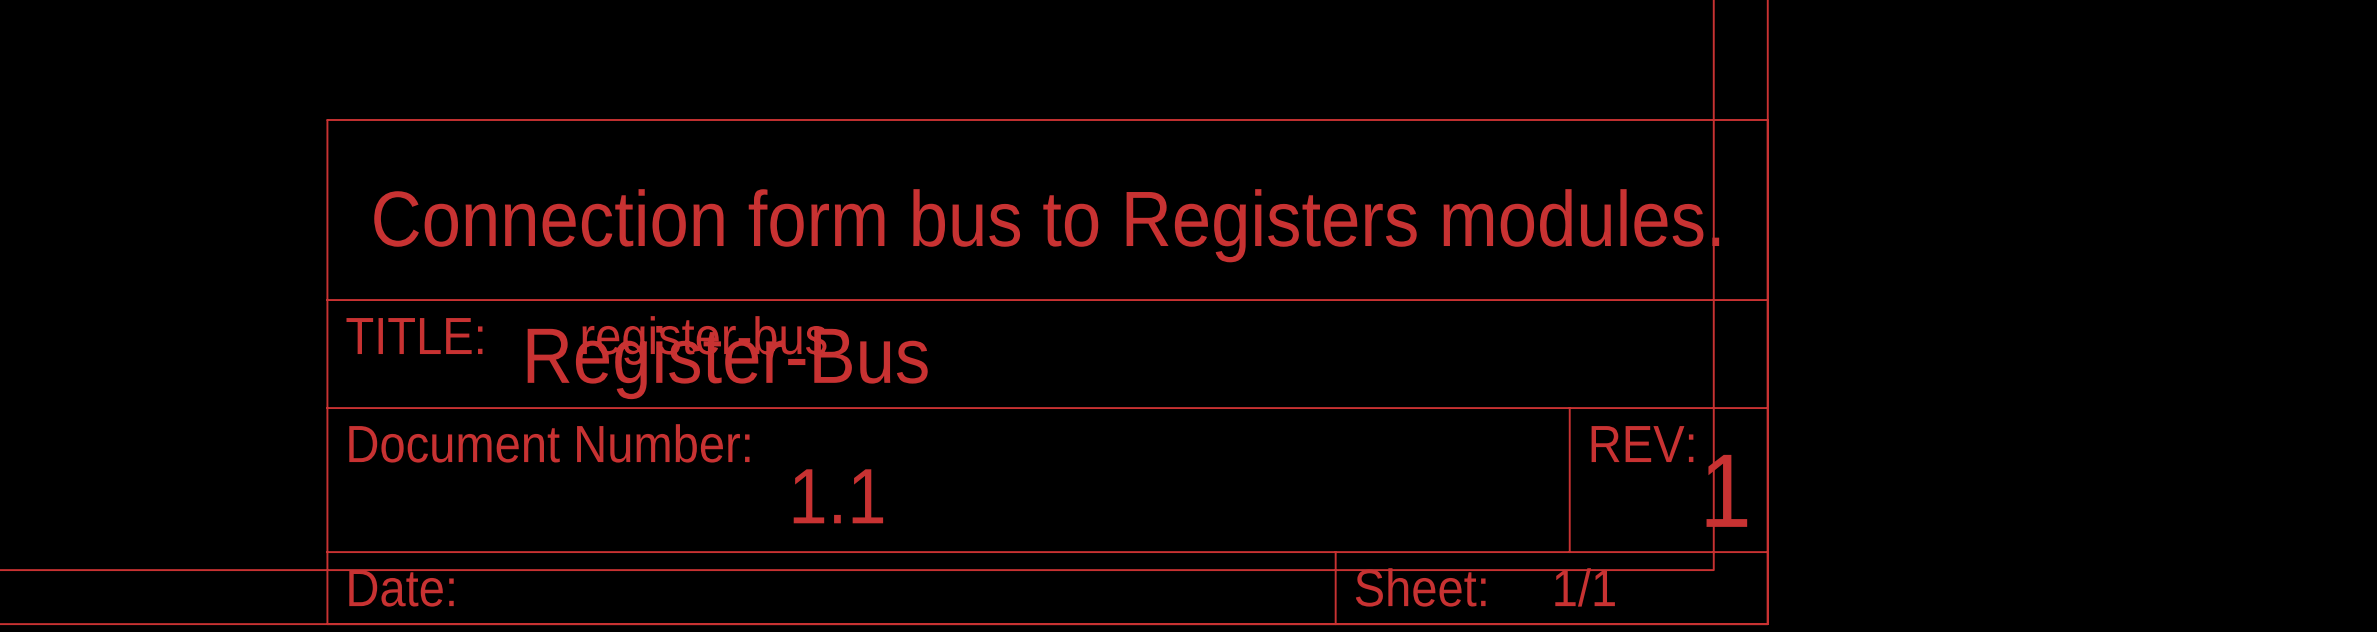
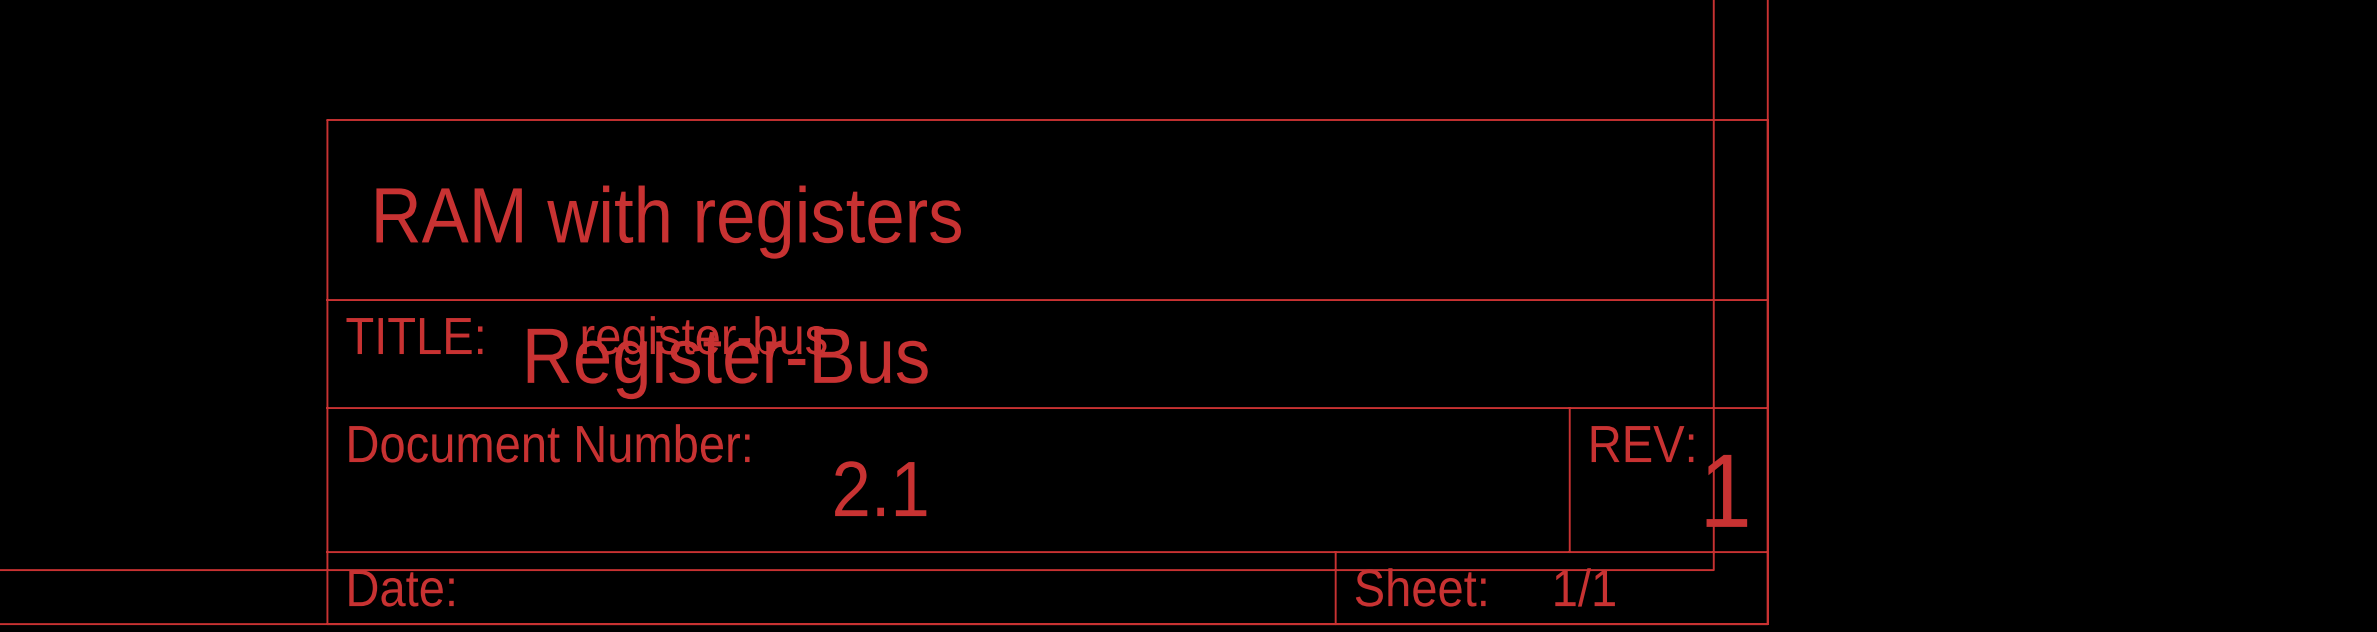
text: Connection form bus to Registers modules. (1046, 225) -> RAM with registers (668, 222)
text: 1.1 (838, 496) -> 2.1 (880, 488)

